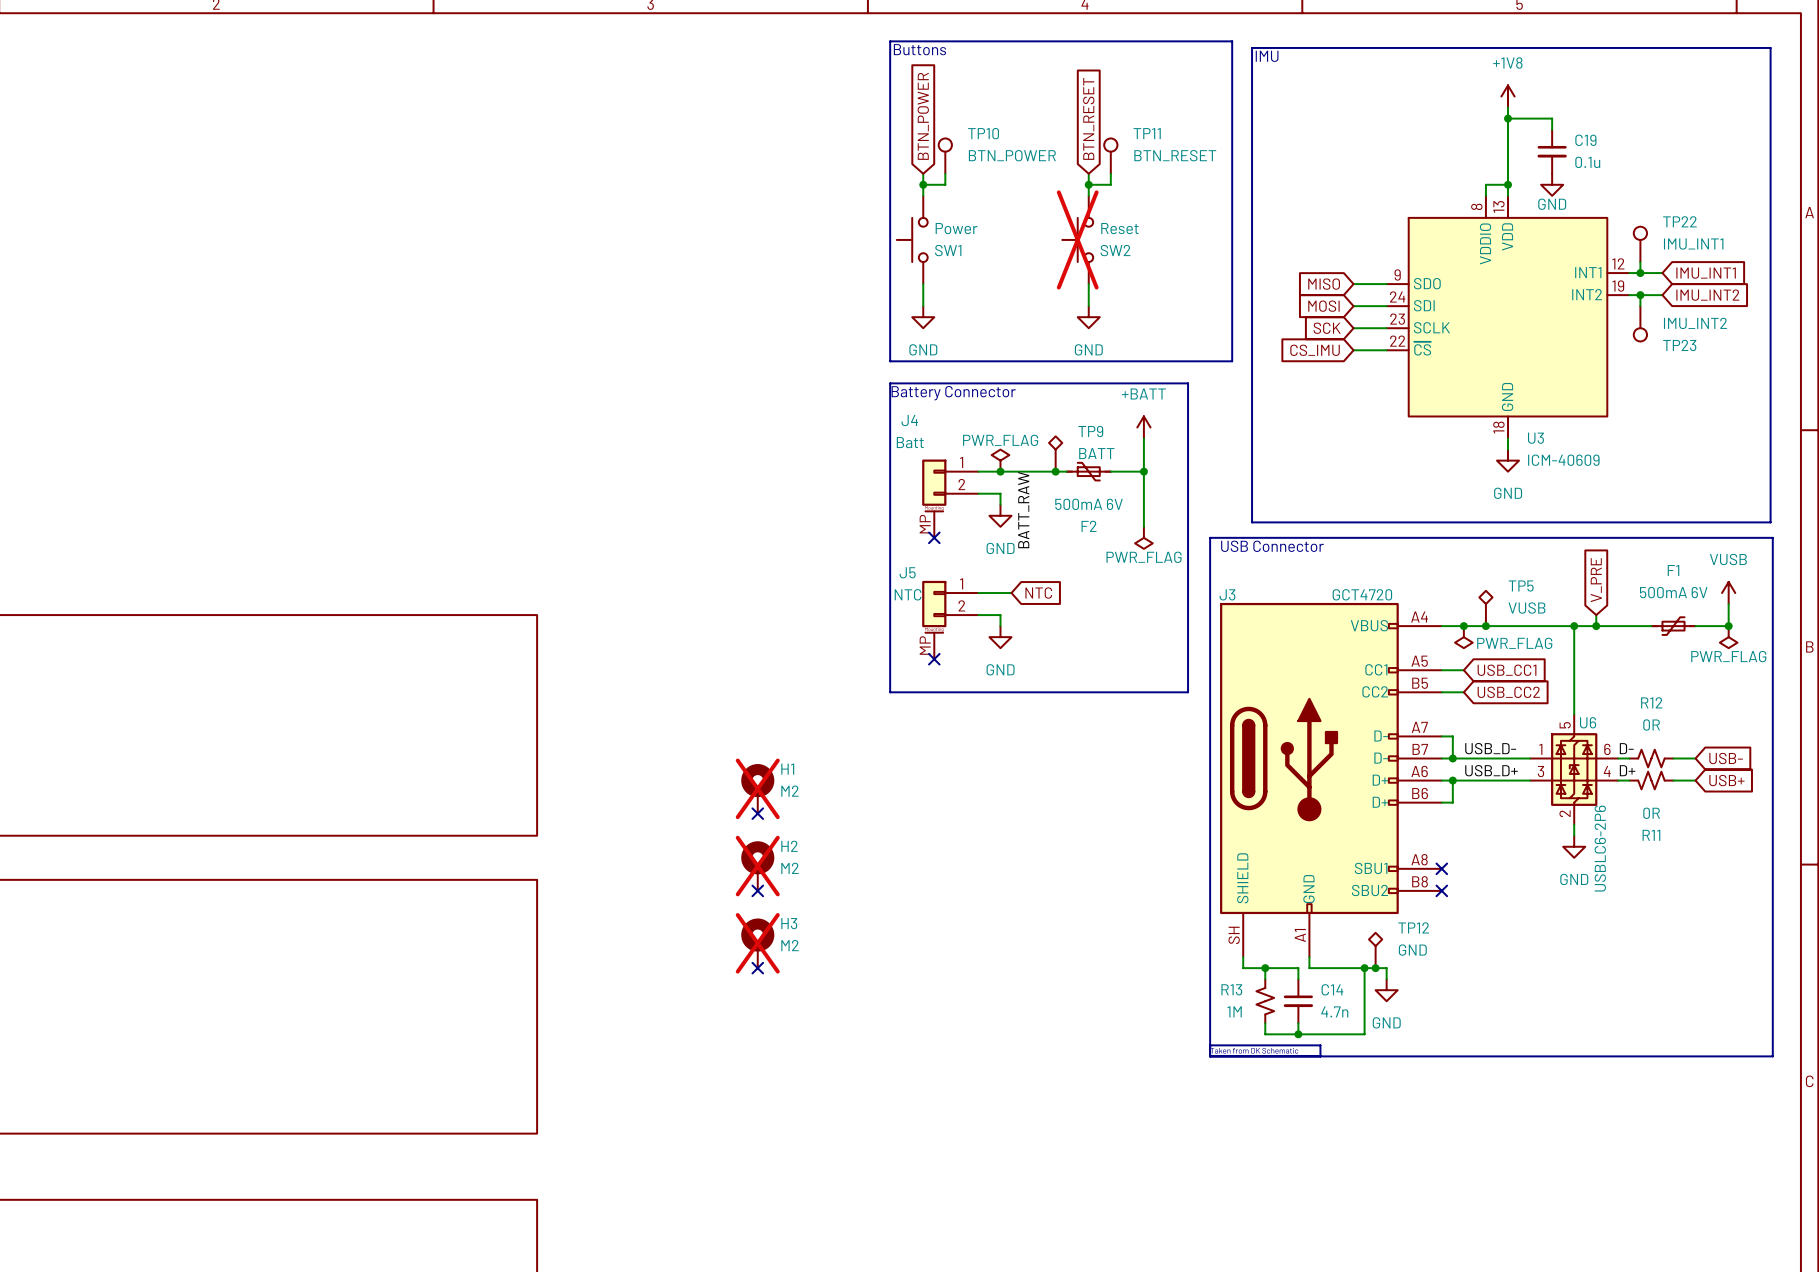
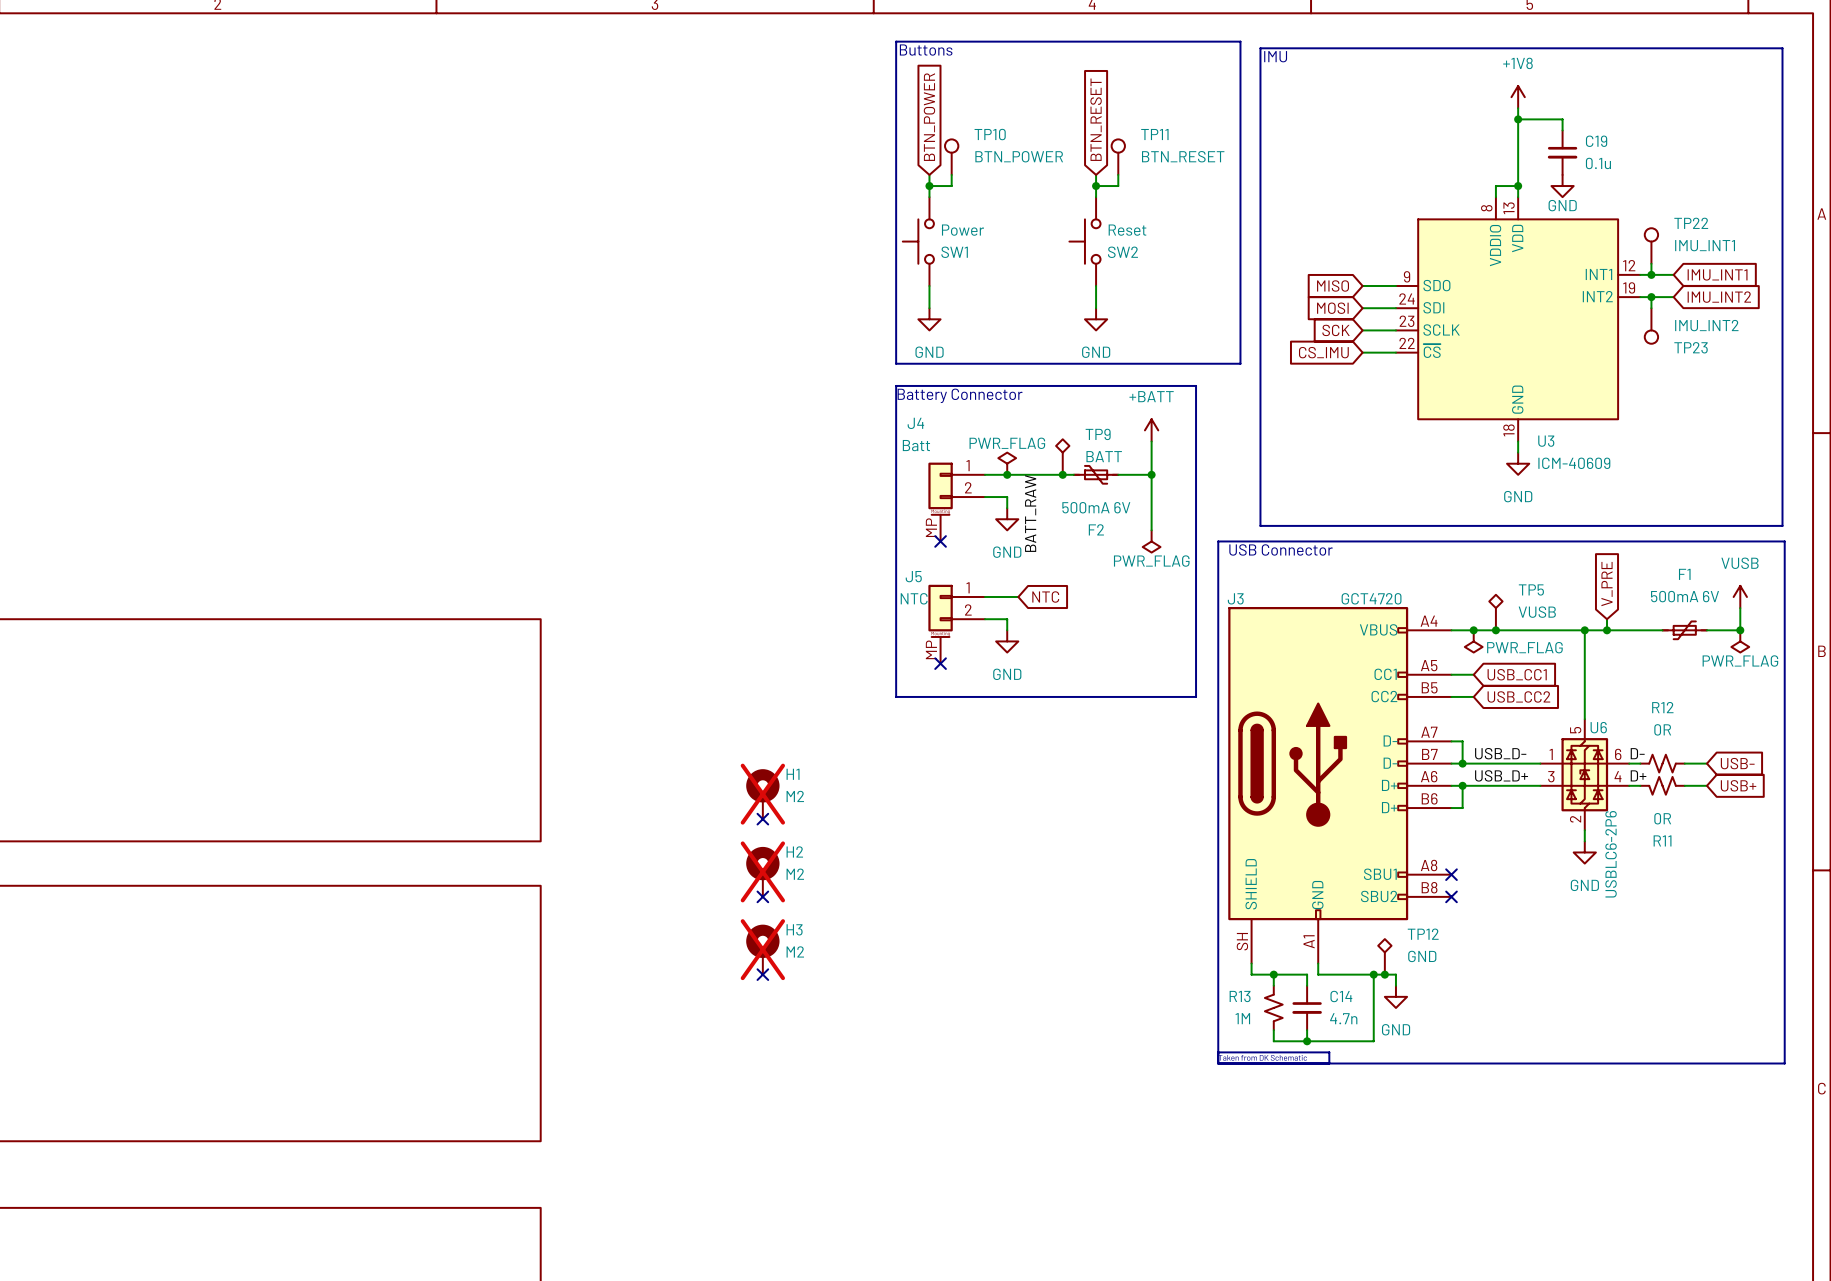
SW2 do-not-place cross: (1077, 239) -> none

